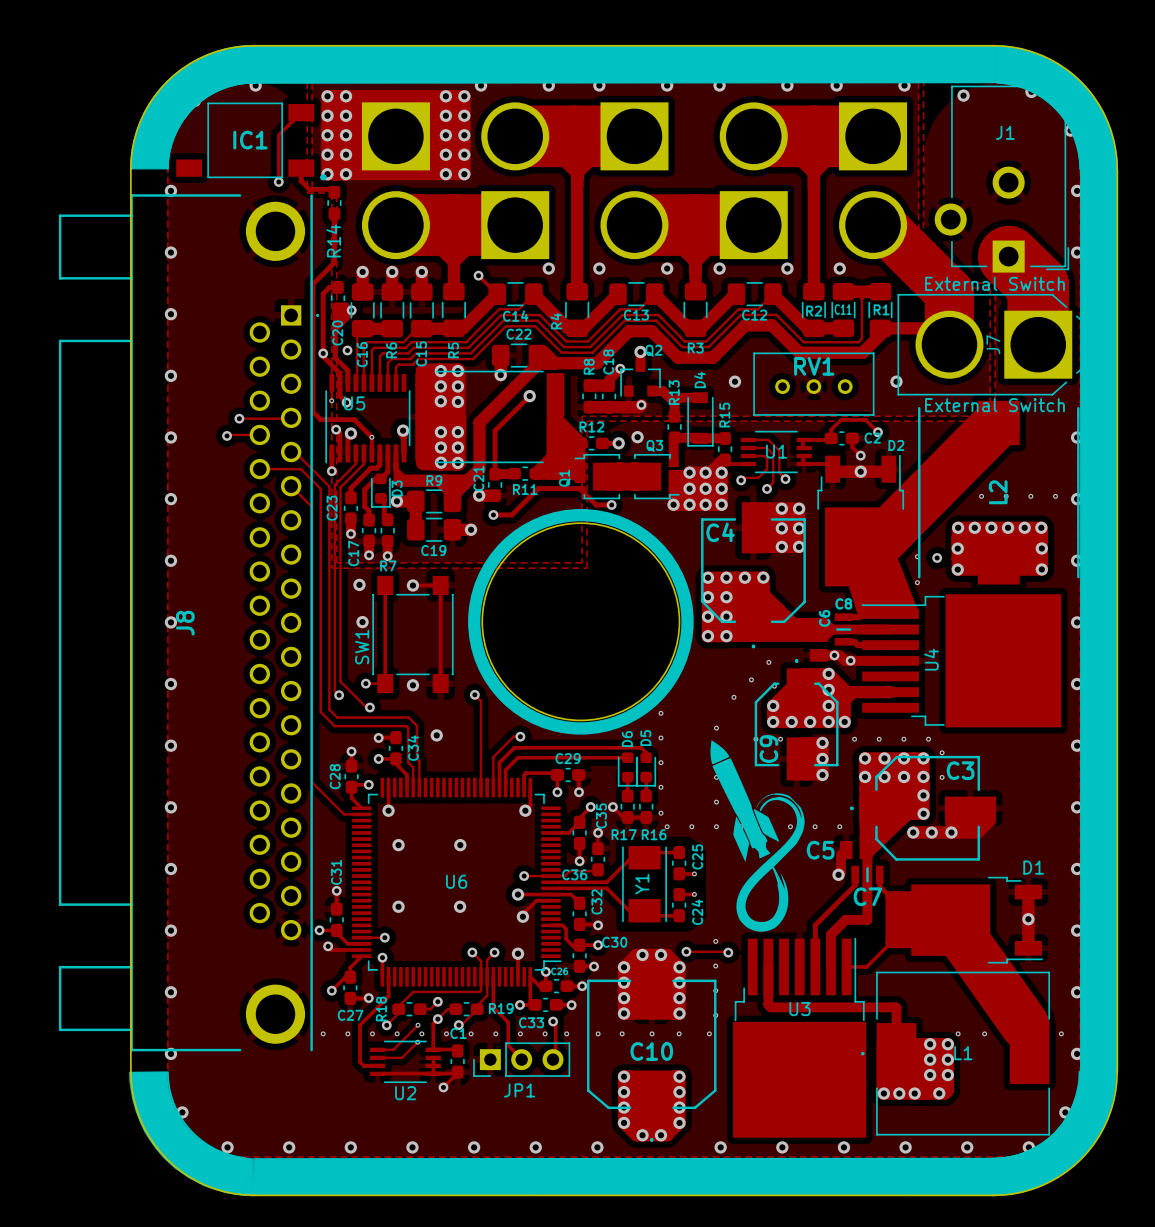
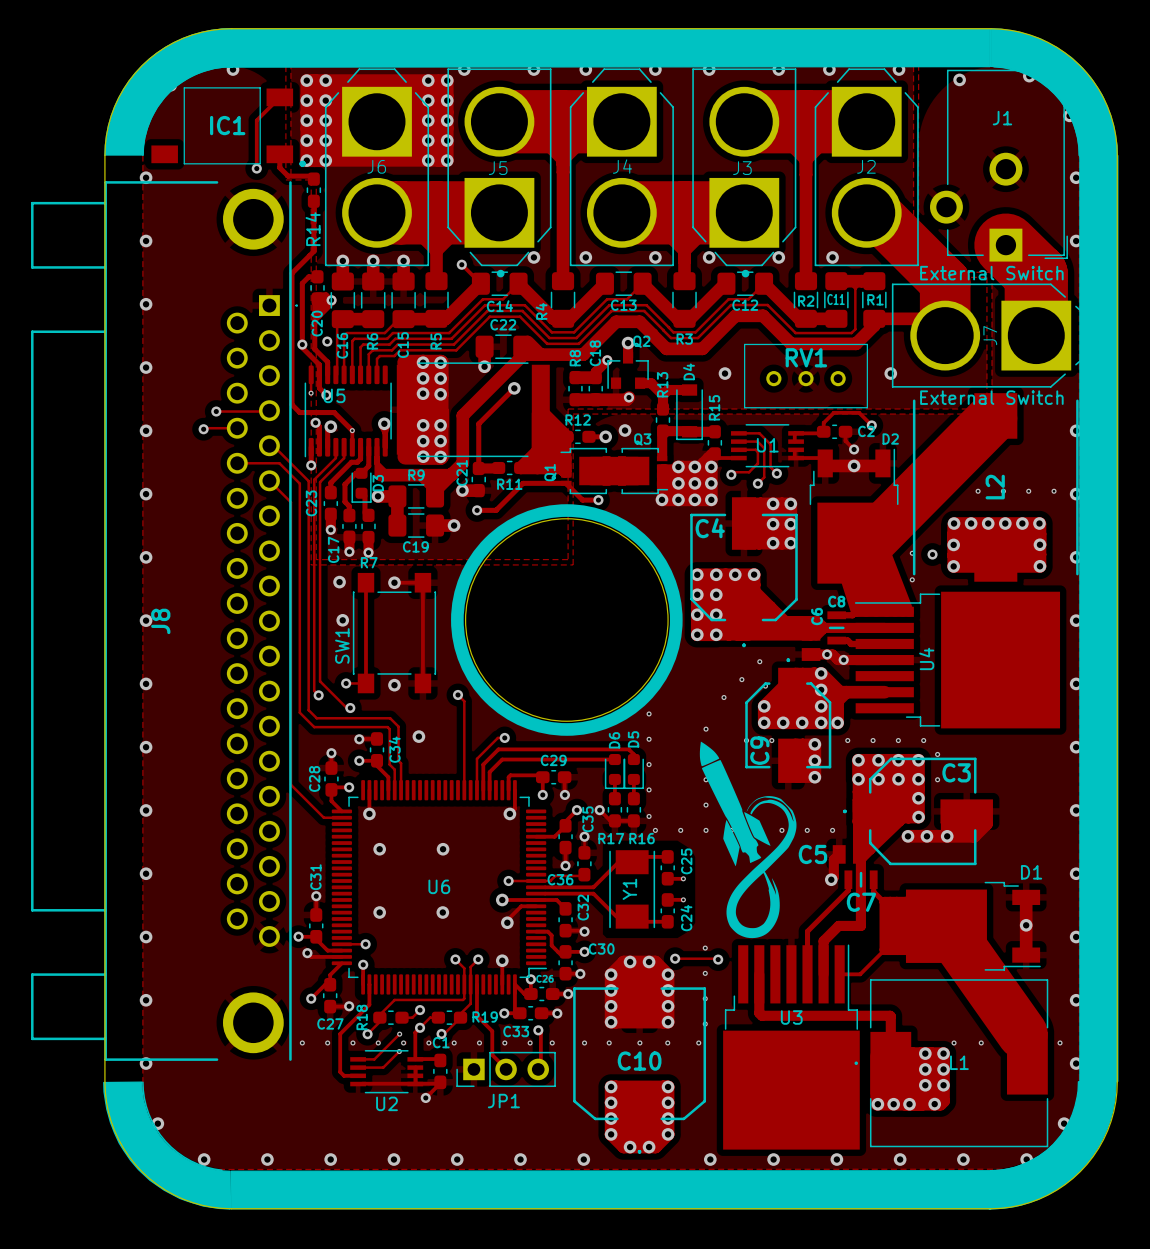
J6 side: bottom (395, 180) -> top (377, 161)
J5 side: bottom (515, 180) -> top (499, 172)
J4 side: bottom (634, 180) -> top (621, 161)
J3 side: bottom (753, 180) -> top (744, 172)
J2 side: bottom (873, 180) -> top (866, 161)

